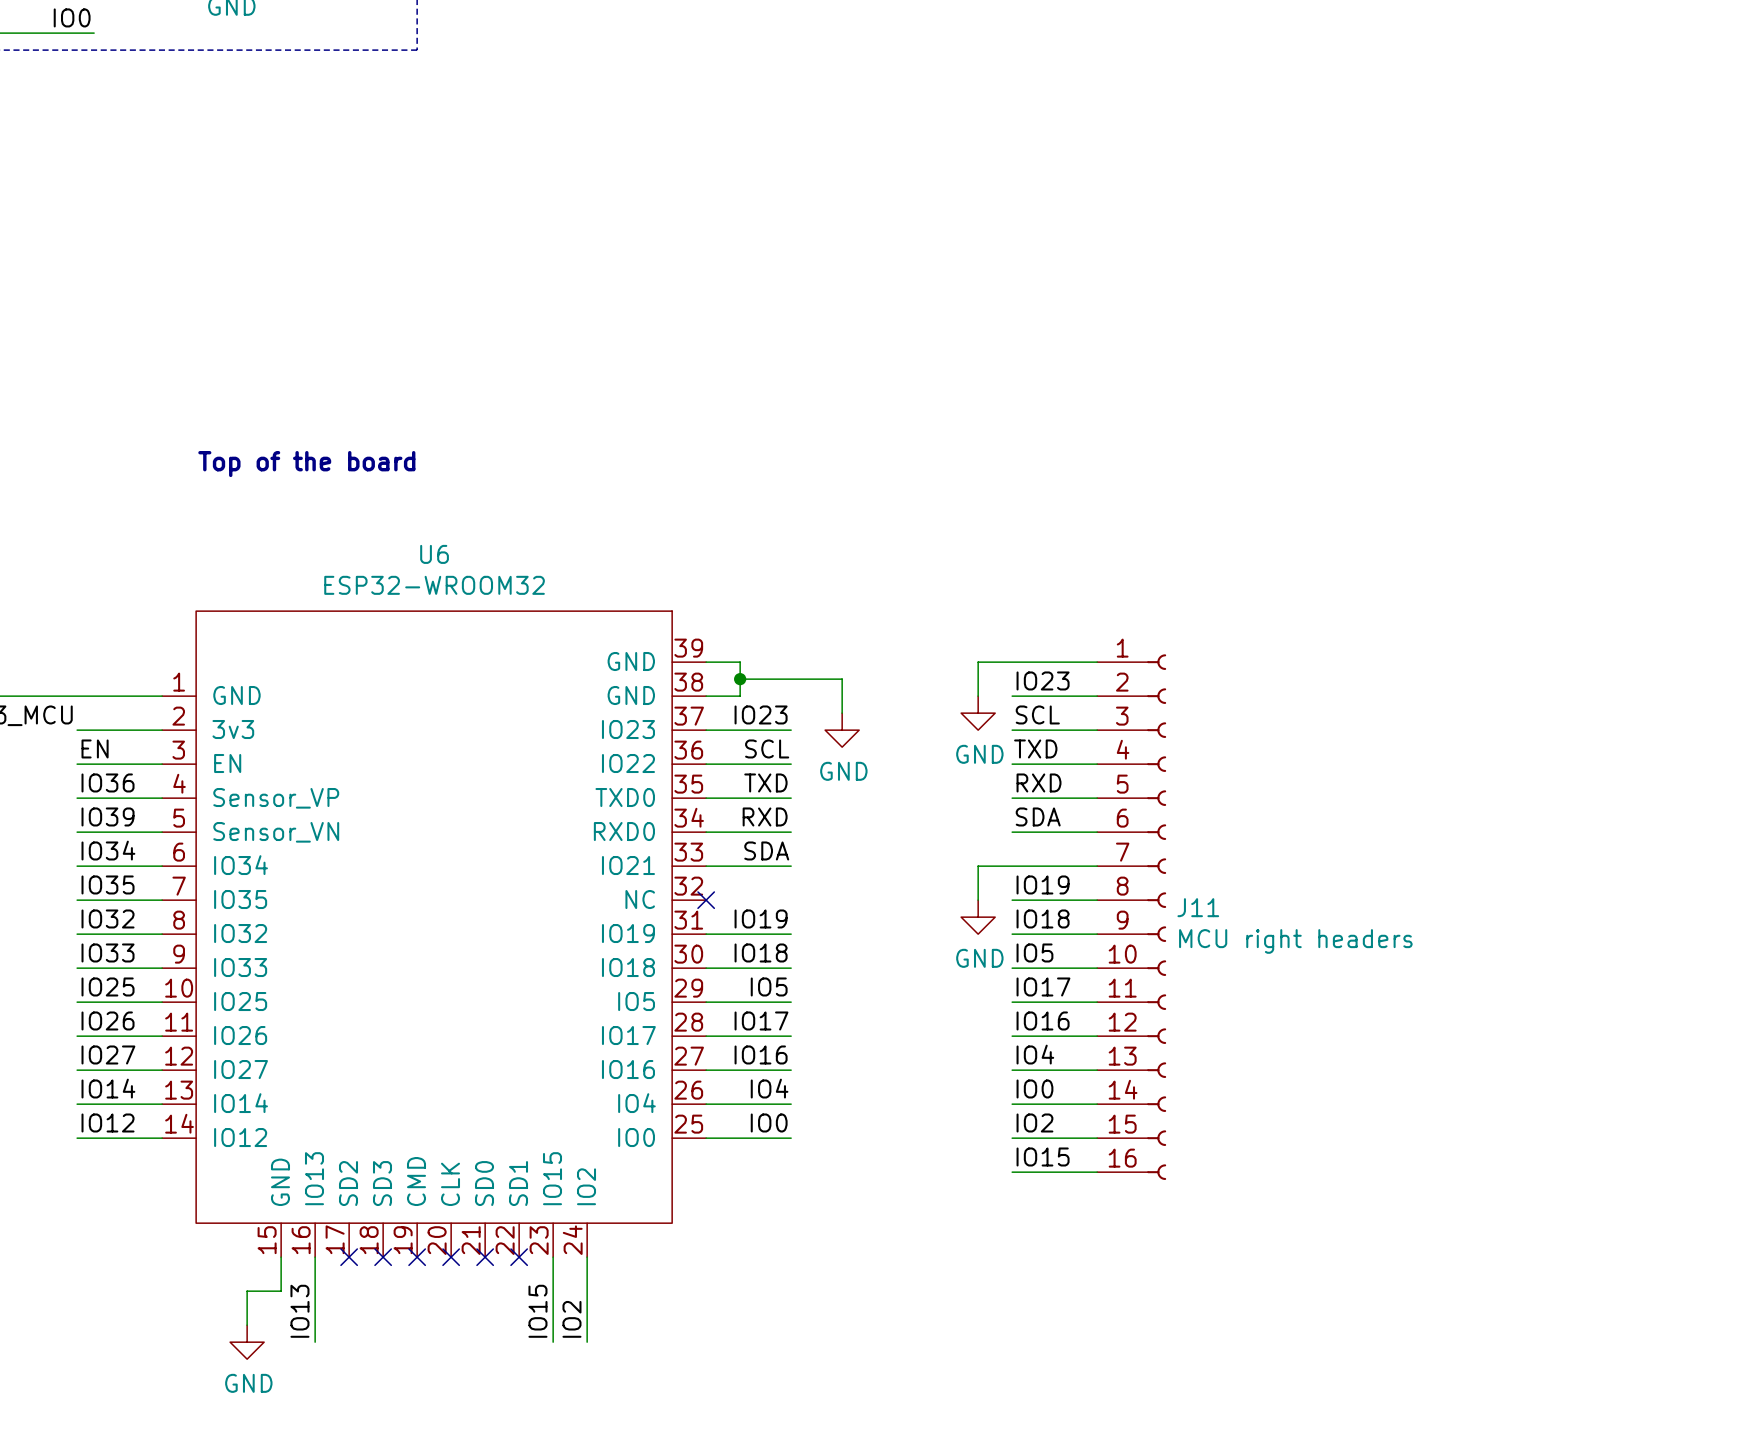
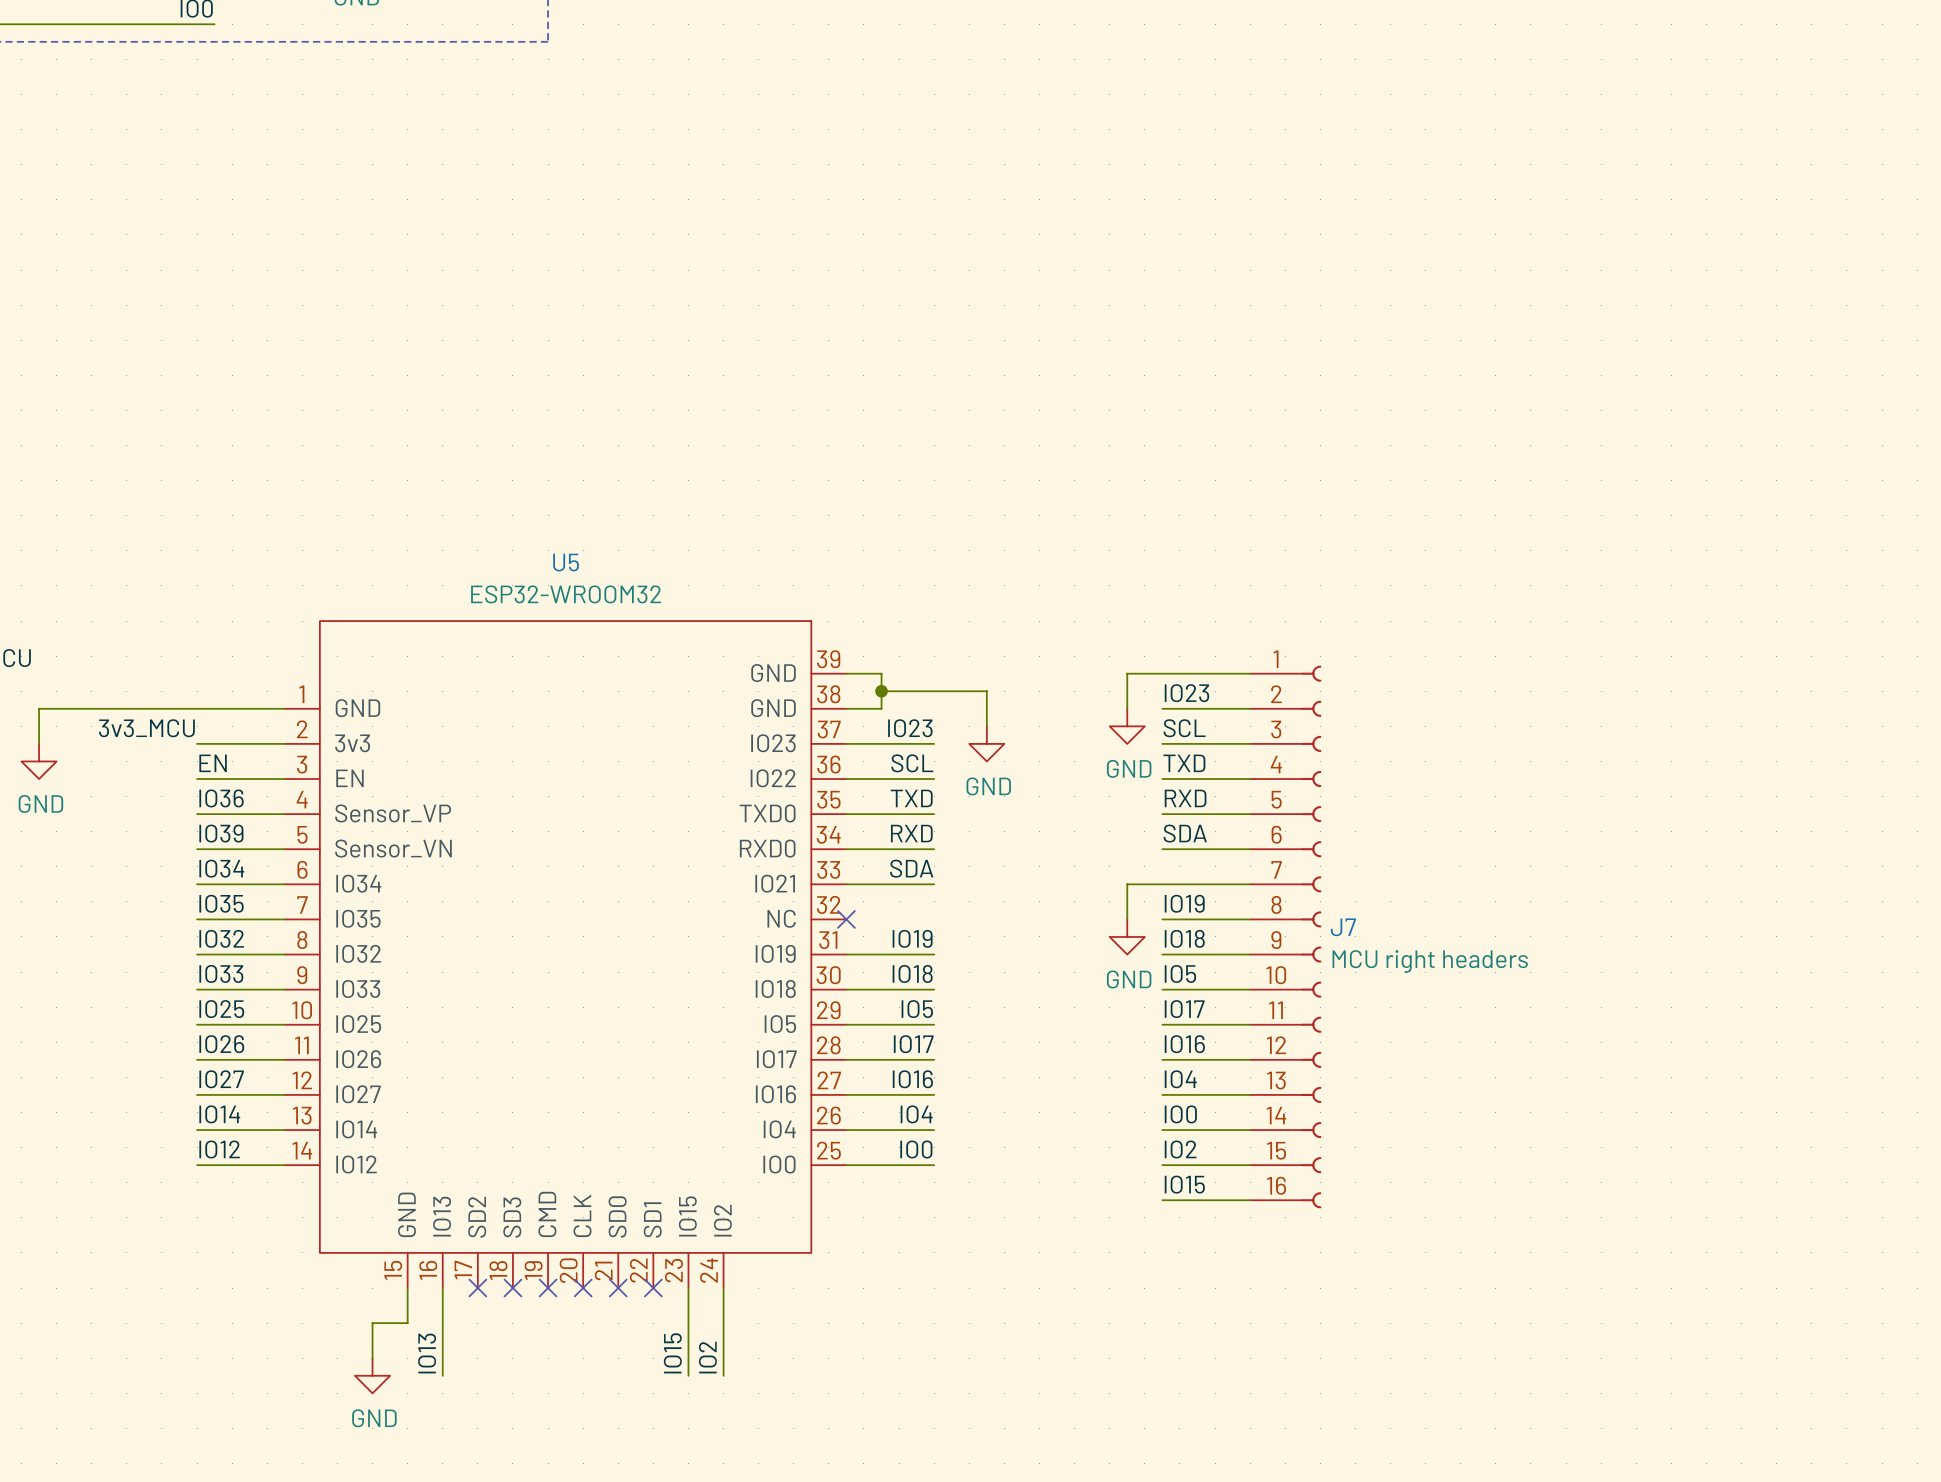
text: Top of the board (306, 464) -> none
U6 name: U6 (434, 554) -> U5 (566, 562)
J11 name: J11 (1198, 907) -> J7 (1343, 927)

